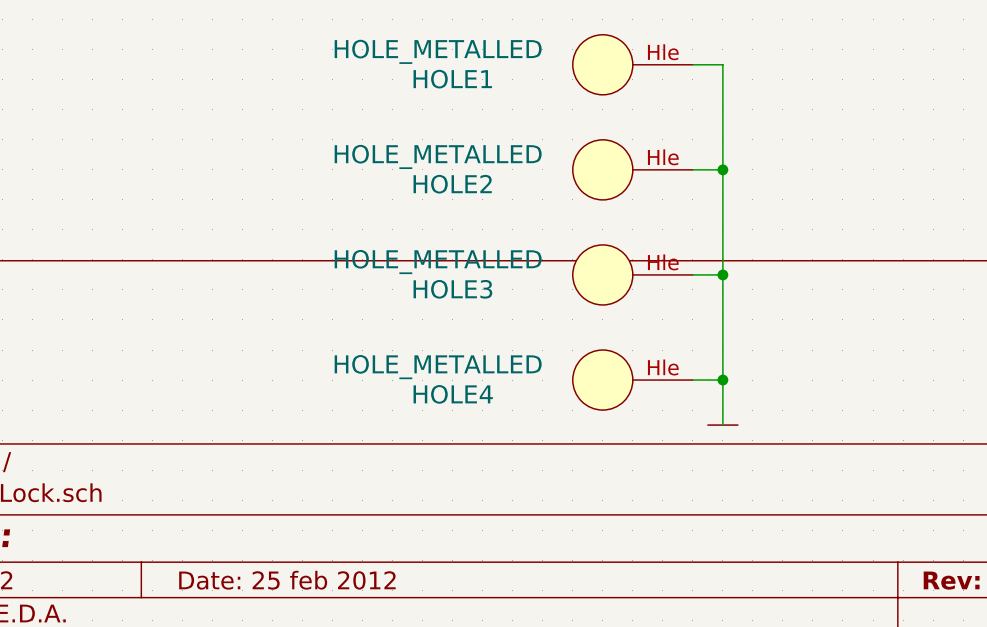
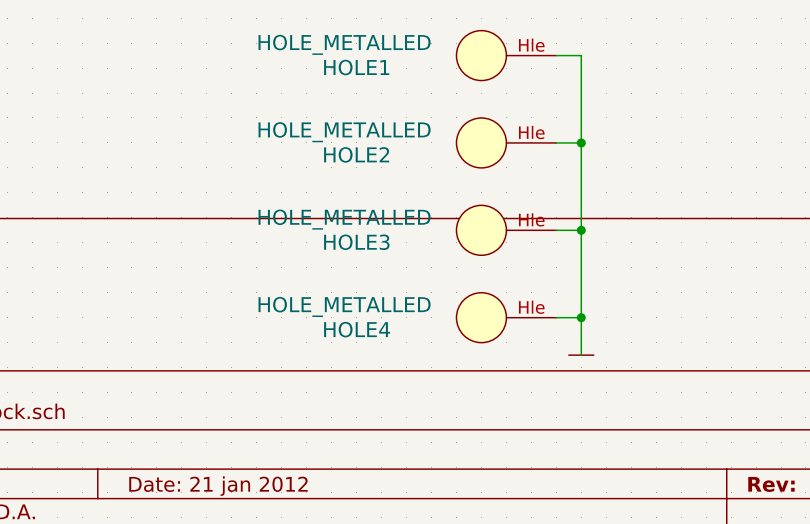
title block: Date: 25 feb 2012 (287, 580) -> Date: 21 jan 2012 (218, 486)

